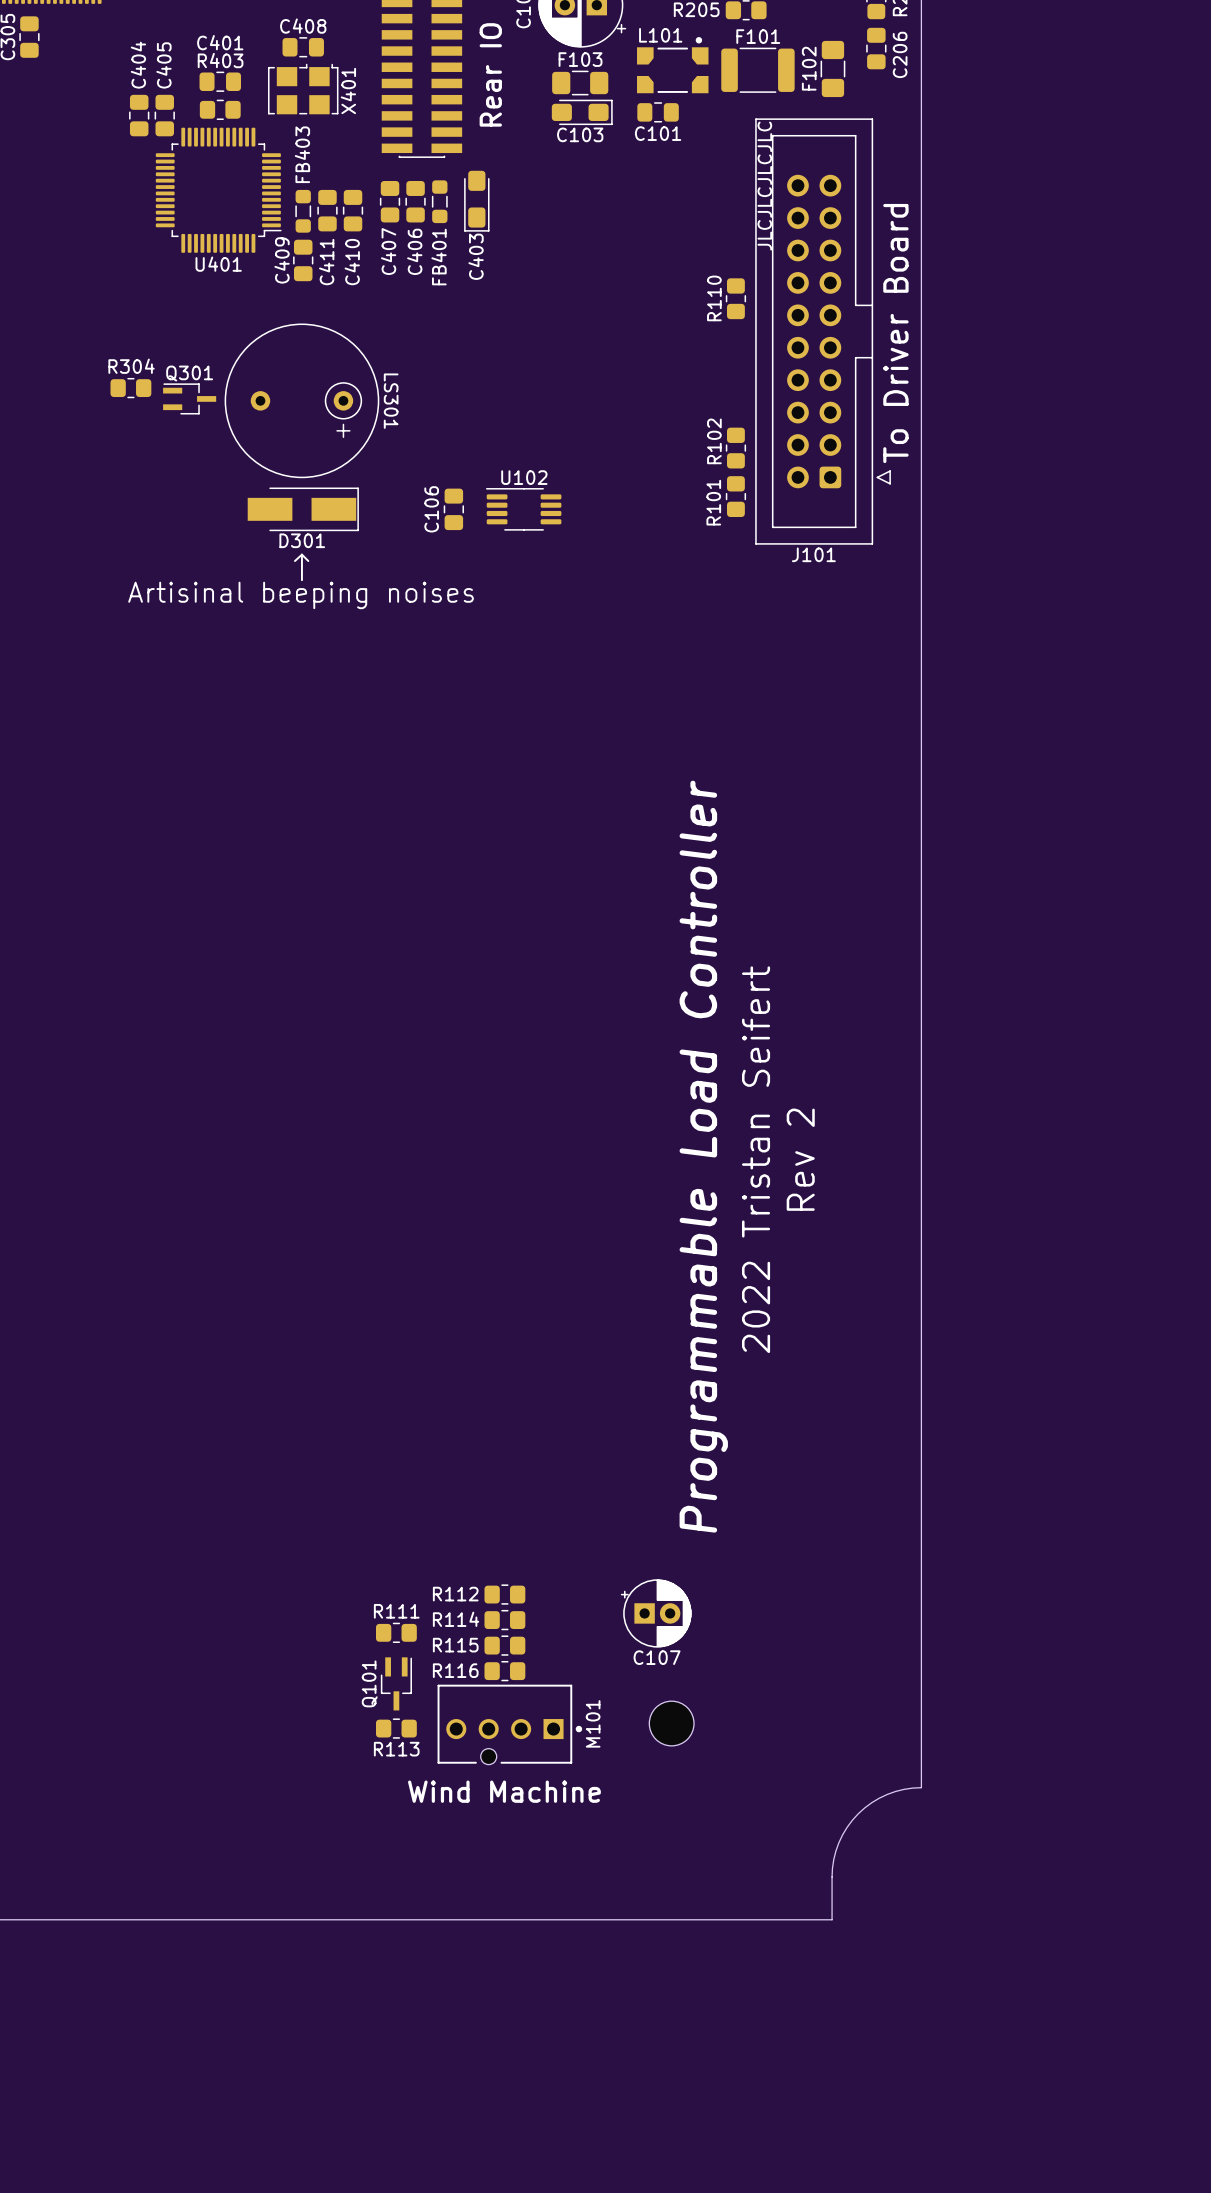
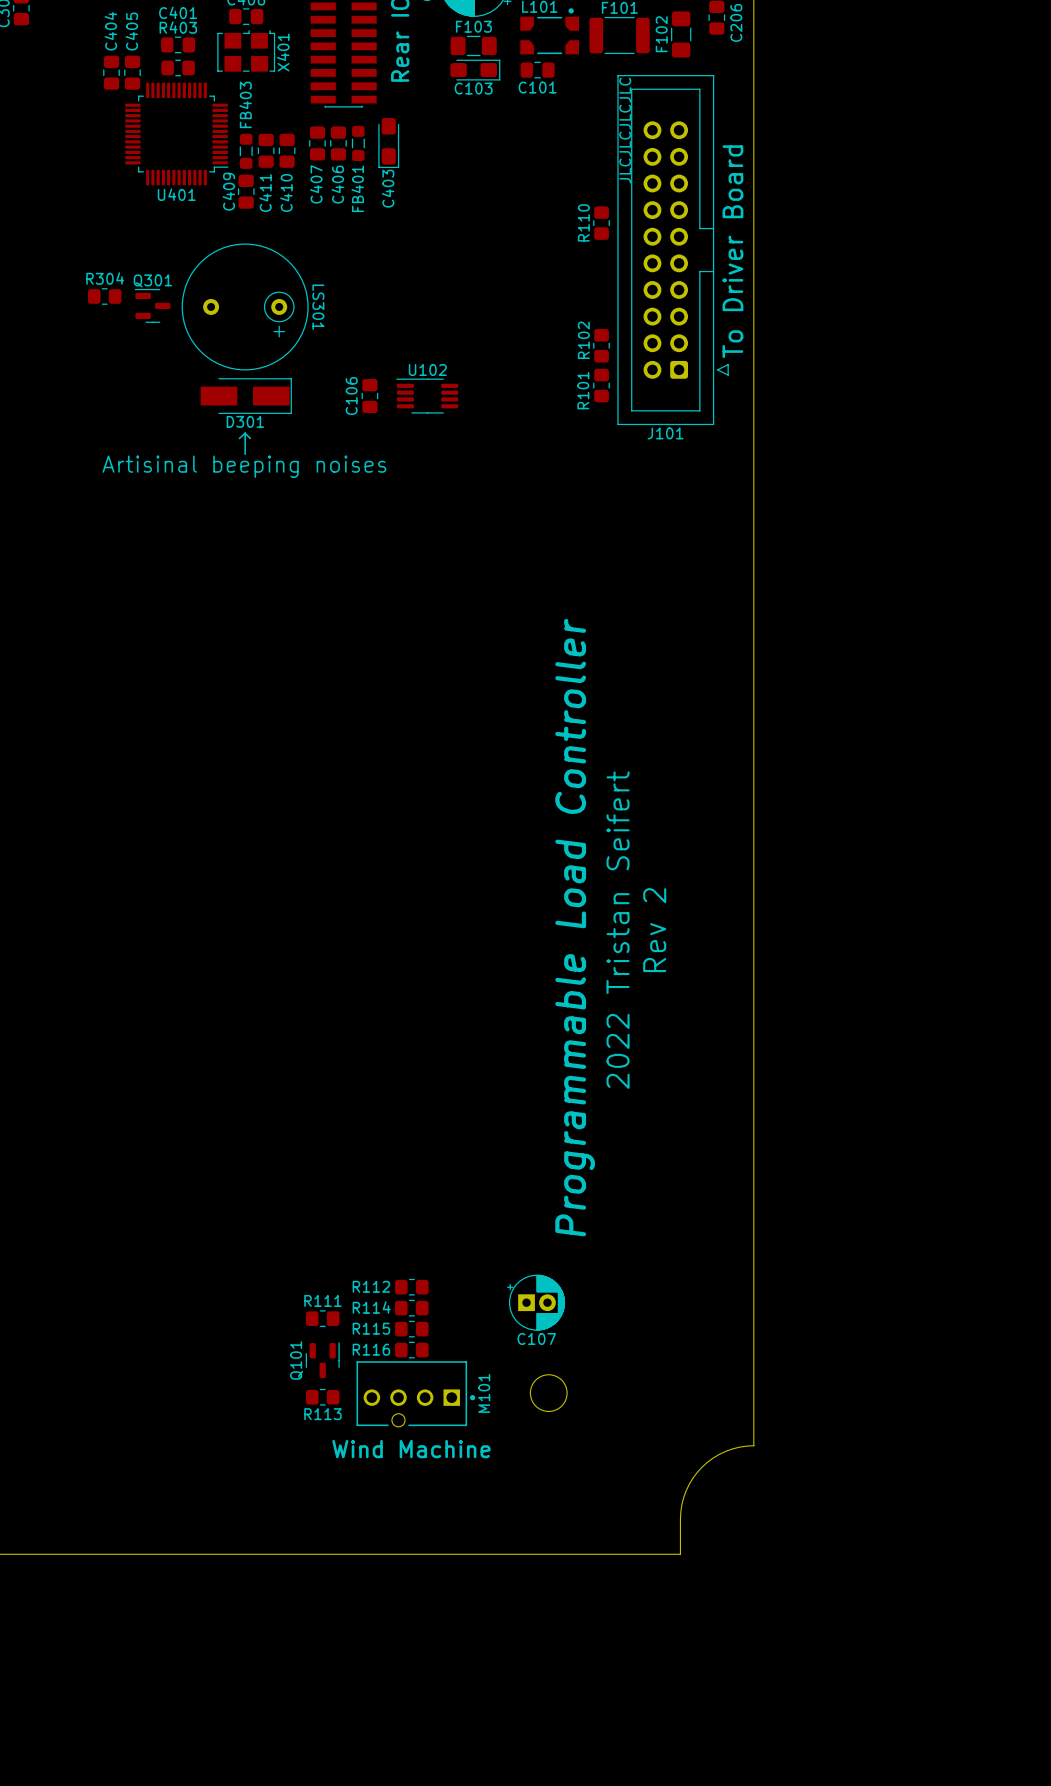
Q301 footprint: [163, 383, 217, 415] -> [134, 288, 171, 323]
Q101 footprint: [380, 1657, 413, 1711] -> [305, 1342, 340, 1379]

